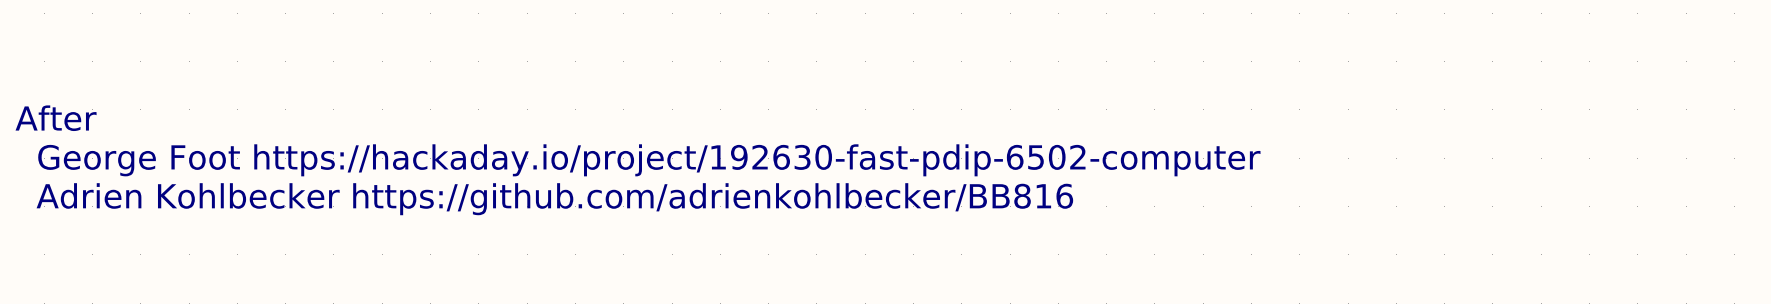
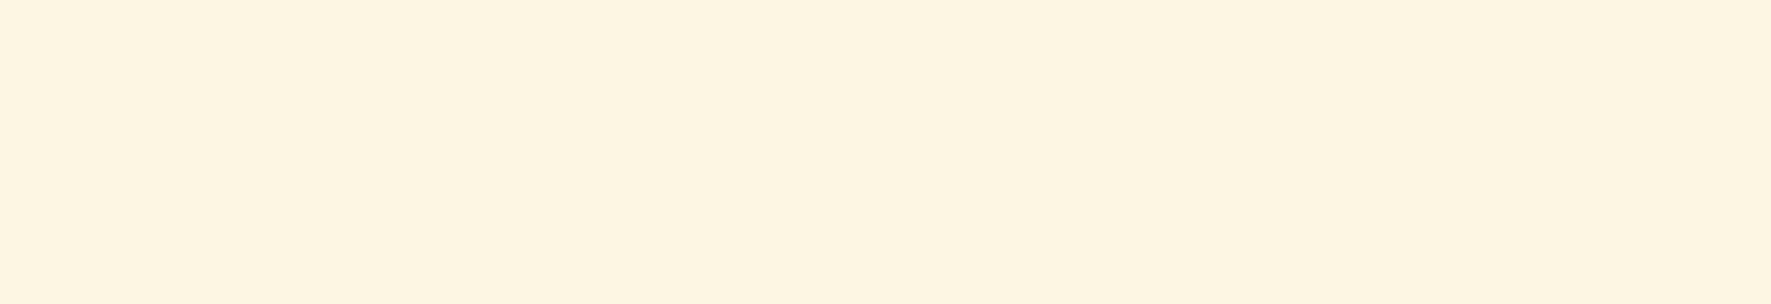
text: After (56, 118) -> none
text: George Foot https://hackaday.io/project/192630-fast-pdip-6502-computer (649, 160) -> none
text: Adrien Kohlbecker https://github.com/adrienkohlbecker/BB816 (554, 199) -> none

